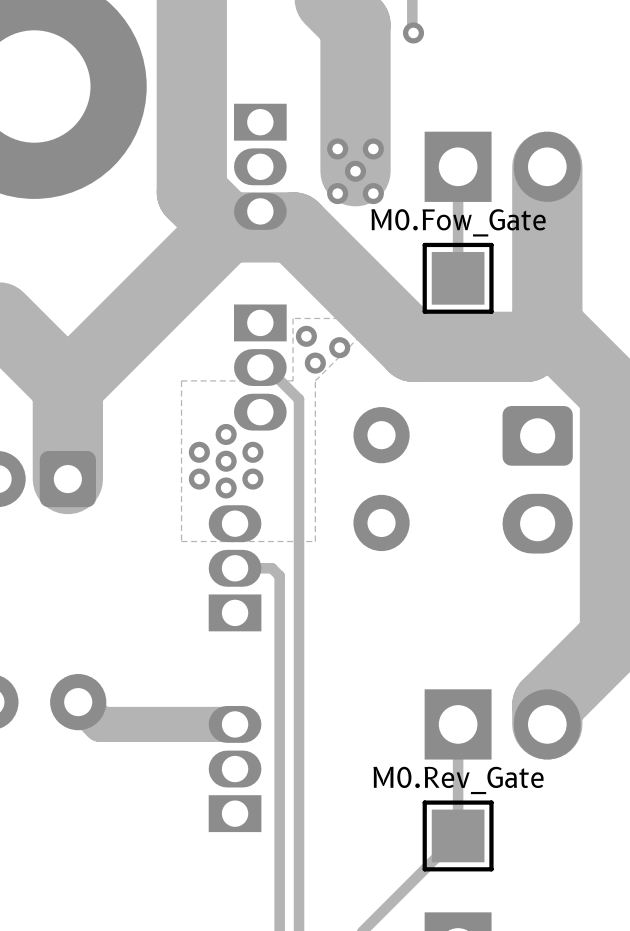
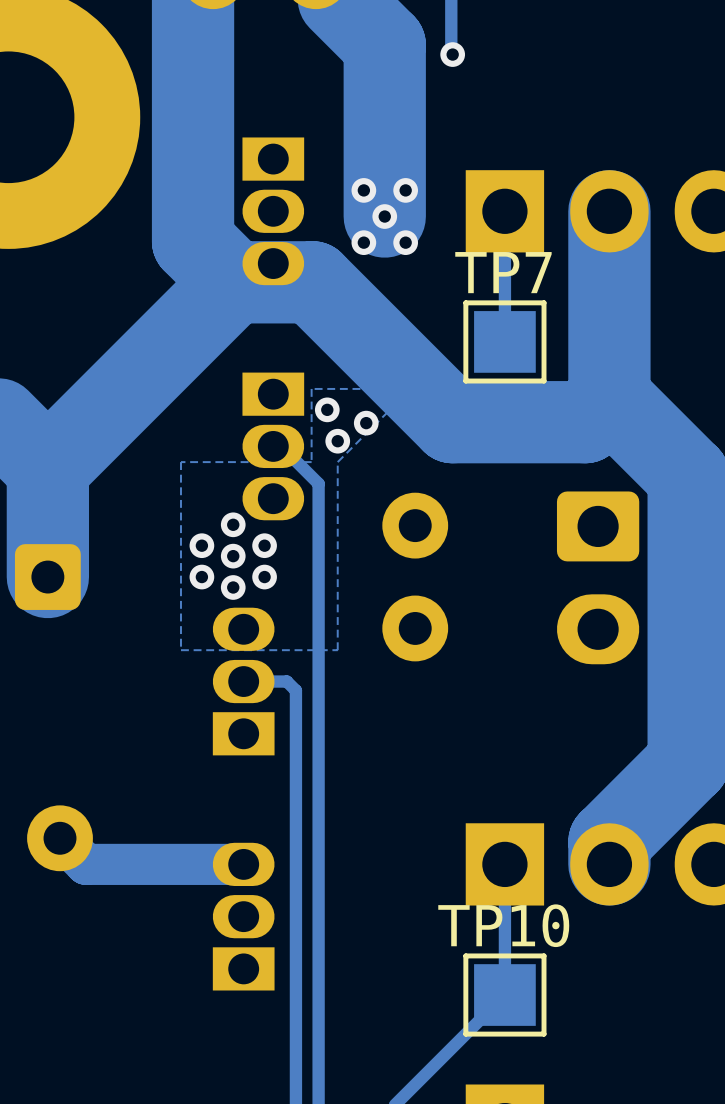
M0.Fow_Gate name: M0.Fow_Gate (458, 222) -> TP7 (503, 272)
M0.Rev_Gate name: M0.Rev_Gate (458, 780) -> TP10 (503, 925)

